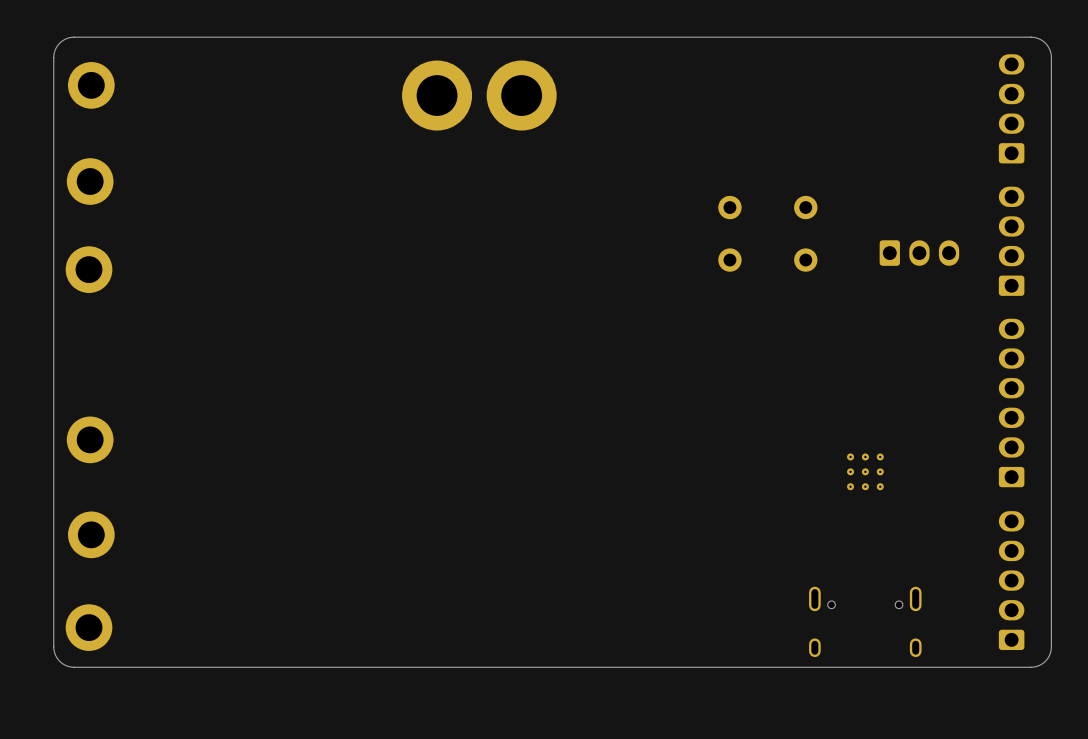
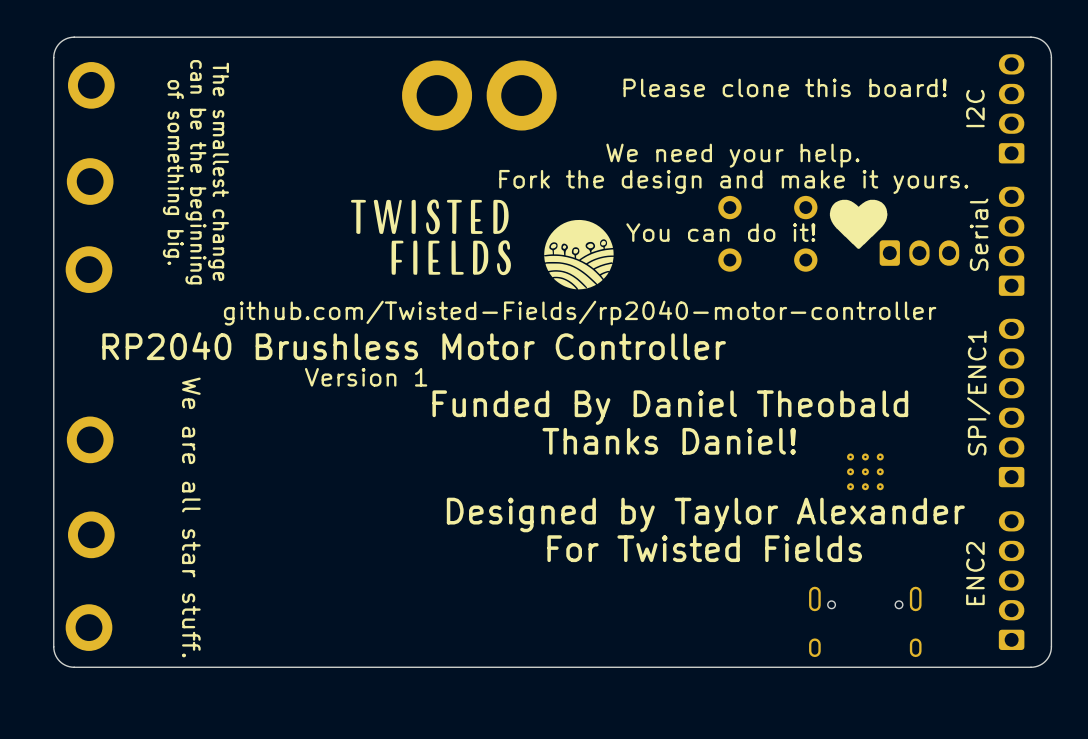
text: none -> Please clone this board! (785, 87)
text: none -> I2C (975, 108)
text: none -> We need your help. (732, 155)
text: none -> The smallest change (218, 171)
text: none -> of something big. (173, 172)
text: none -> can be the beginning (195, 172)
text: none -> Fork the design and make it yours. (733, 181)
drawing: none -> [350, 199, 511, 276]
drawing: none -> [829, 199, 888, 249]
drawing: none -> [544, 219, 614, 290]
text: none -> You can do it! (720, 232)
text: none -> Serial (979, 234)
text: none -> github.com/Twisted-Fields/rp2040-motor-controller (580, 313)
text: none -> RP2040 Brushless Motor Controller (414, 346)
text: none -> Version 1 (366, 377)
text: none -> SPI/ENC1 (978, 393)
text: none -> Funded By Daniel Theobald (670, 407)
text: none -> Thanks Daniel! (669, 441)
text: none -> Designed by Taylor Alexander (705, 514)
text: none -> We are all star stuff. (191, 517)
text: none -> For Twisted Fields (704, 548)
text: none -> ENC2 (975, 573)

